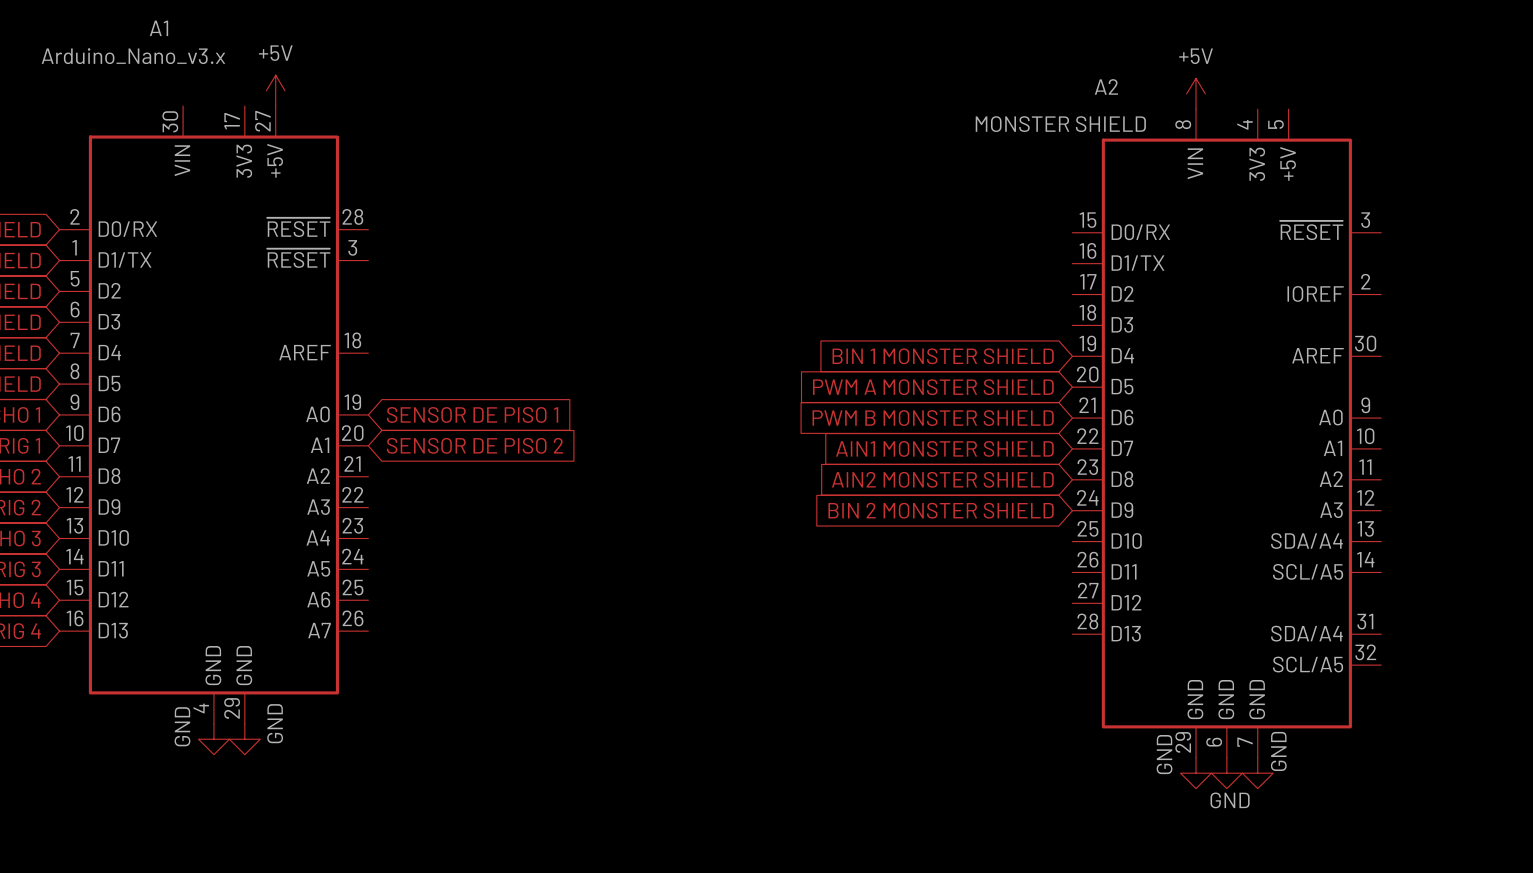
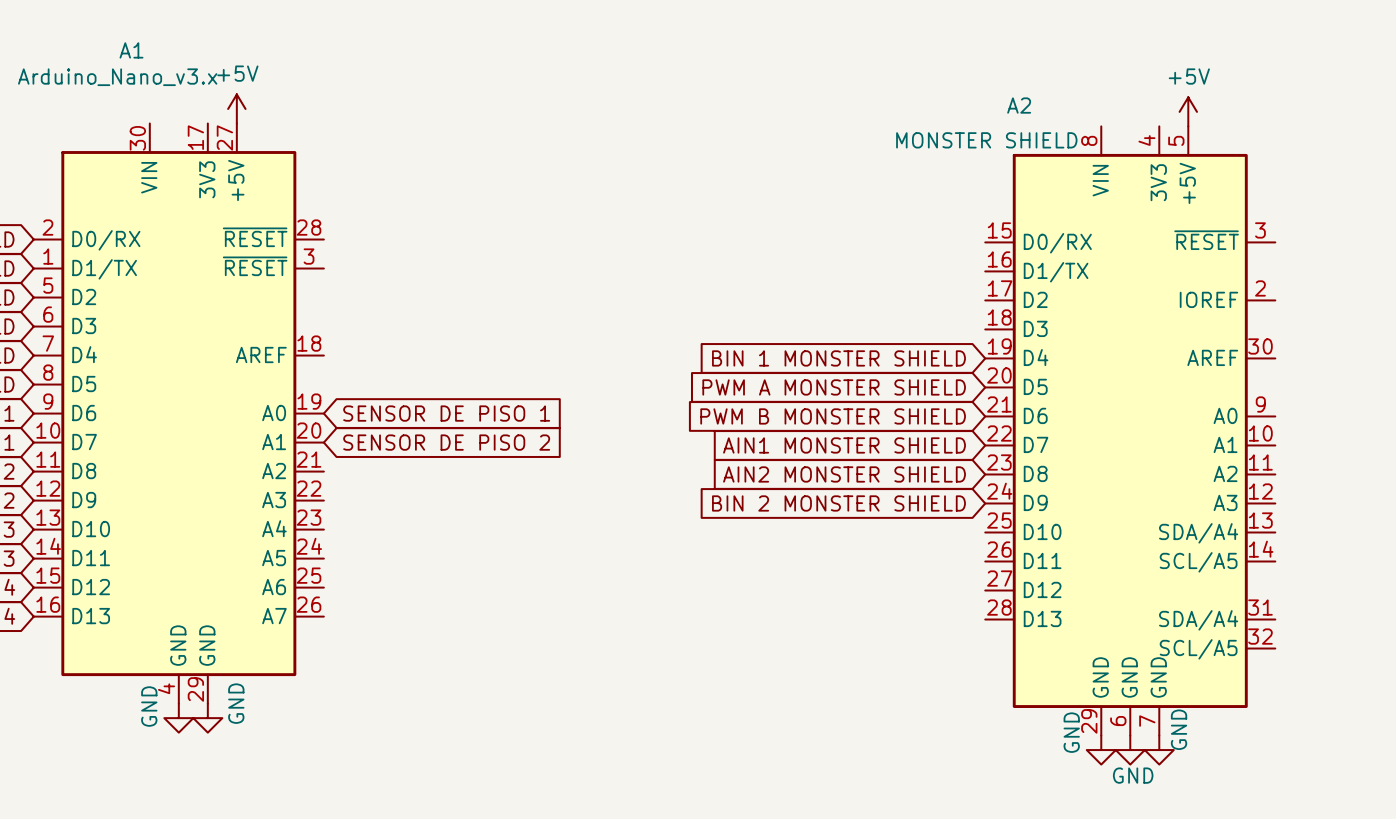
power symbol position: +5V (1195, 93) -> +5V (1188, 111)

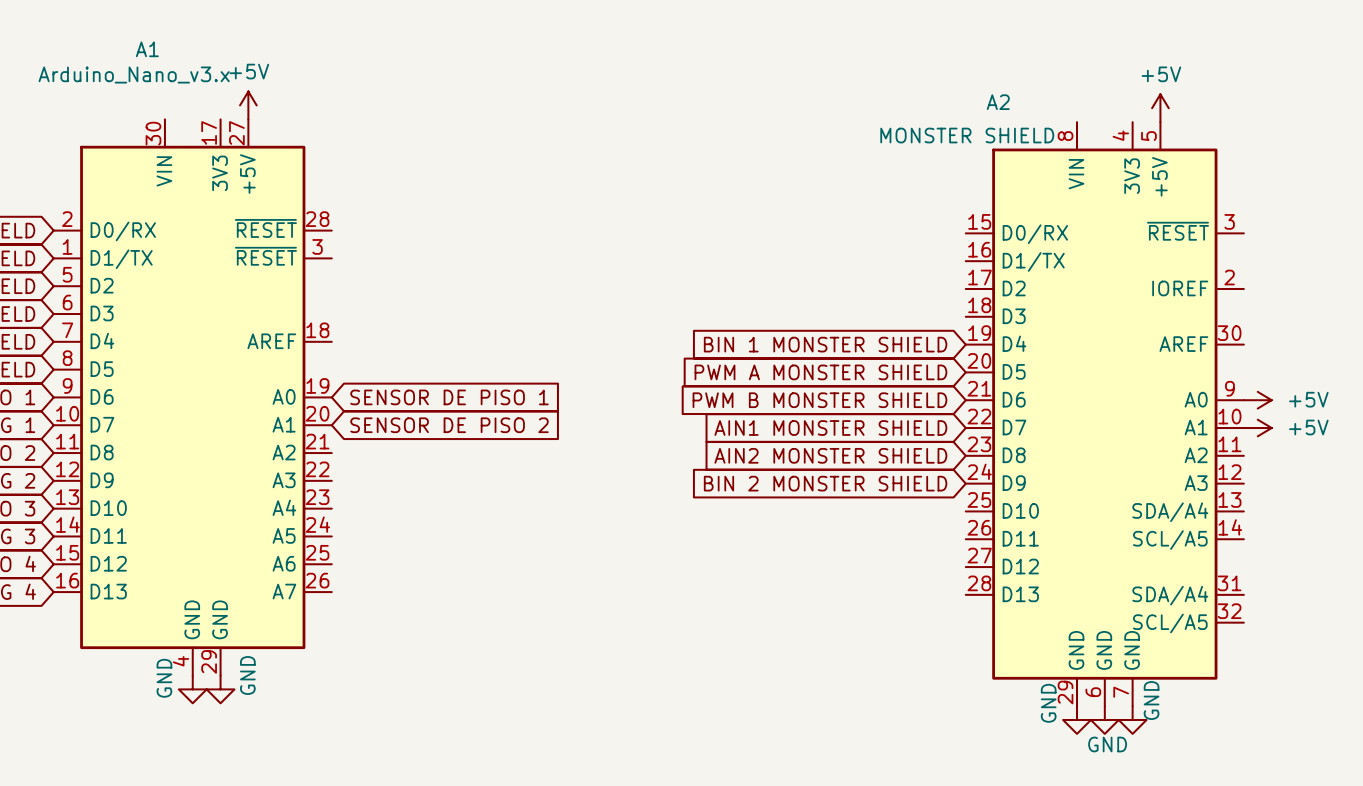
power symbol: none -> +5V (1257, 400)
power symbol: none -> +5V (1257, 428)

